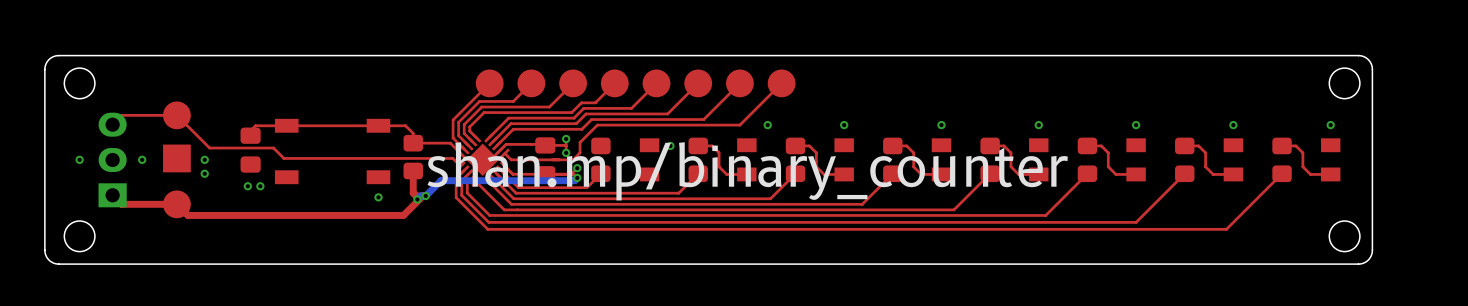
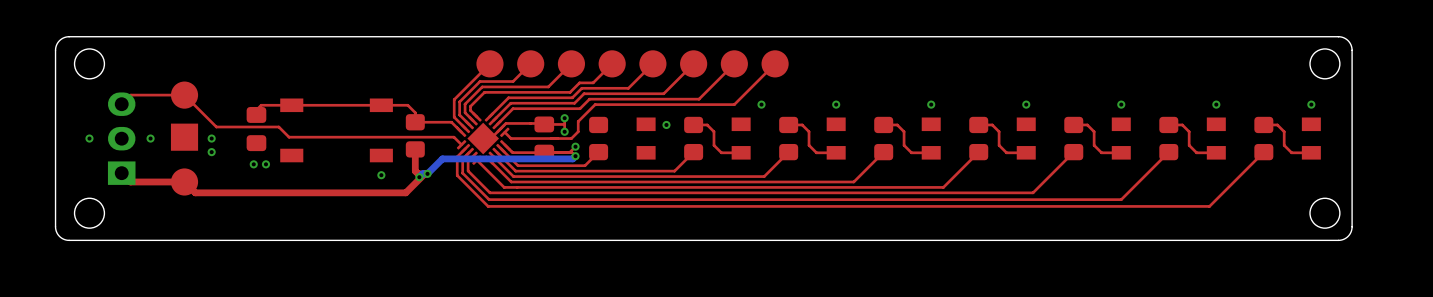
text: shan.mp/binary_counter (747, 171) -> none

